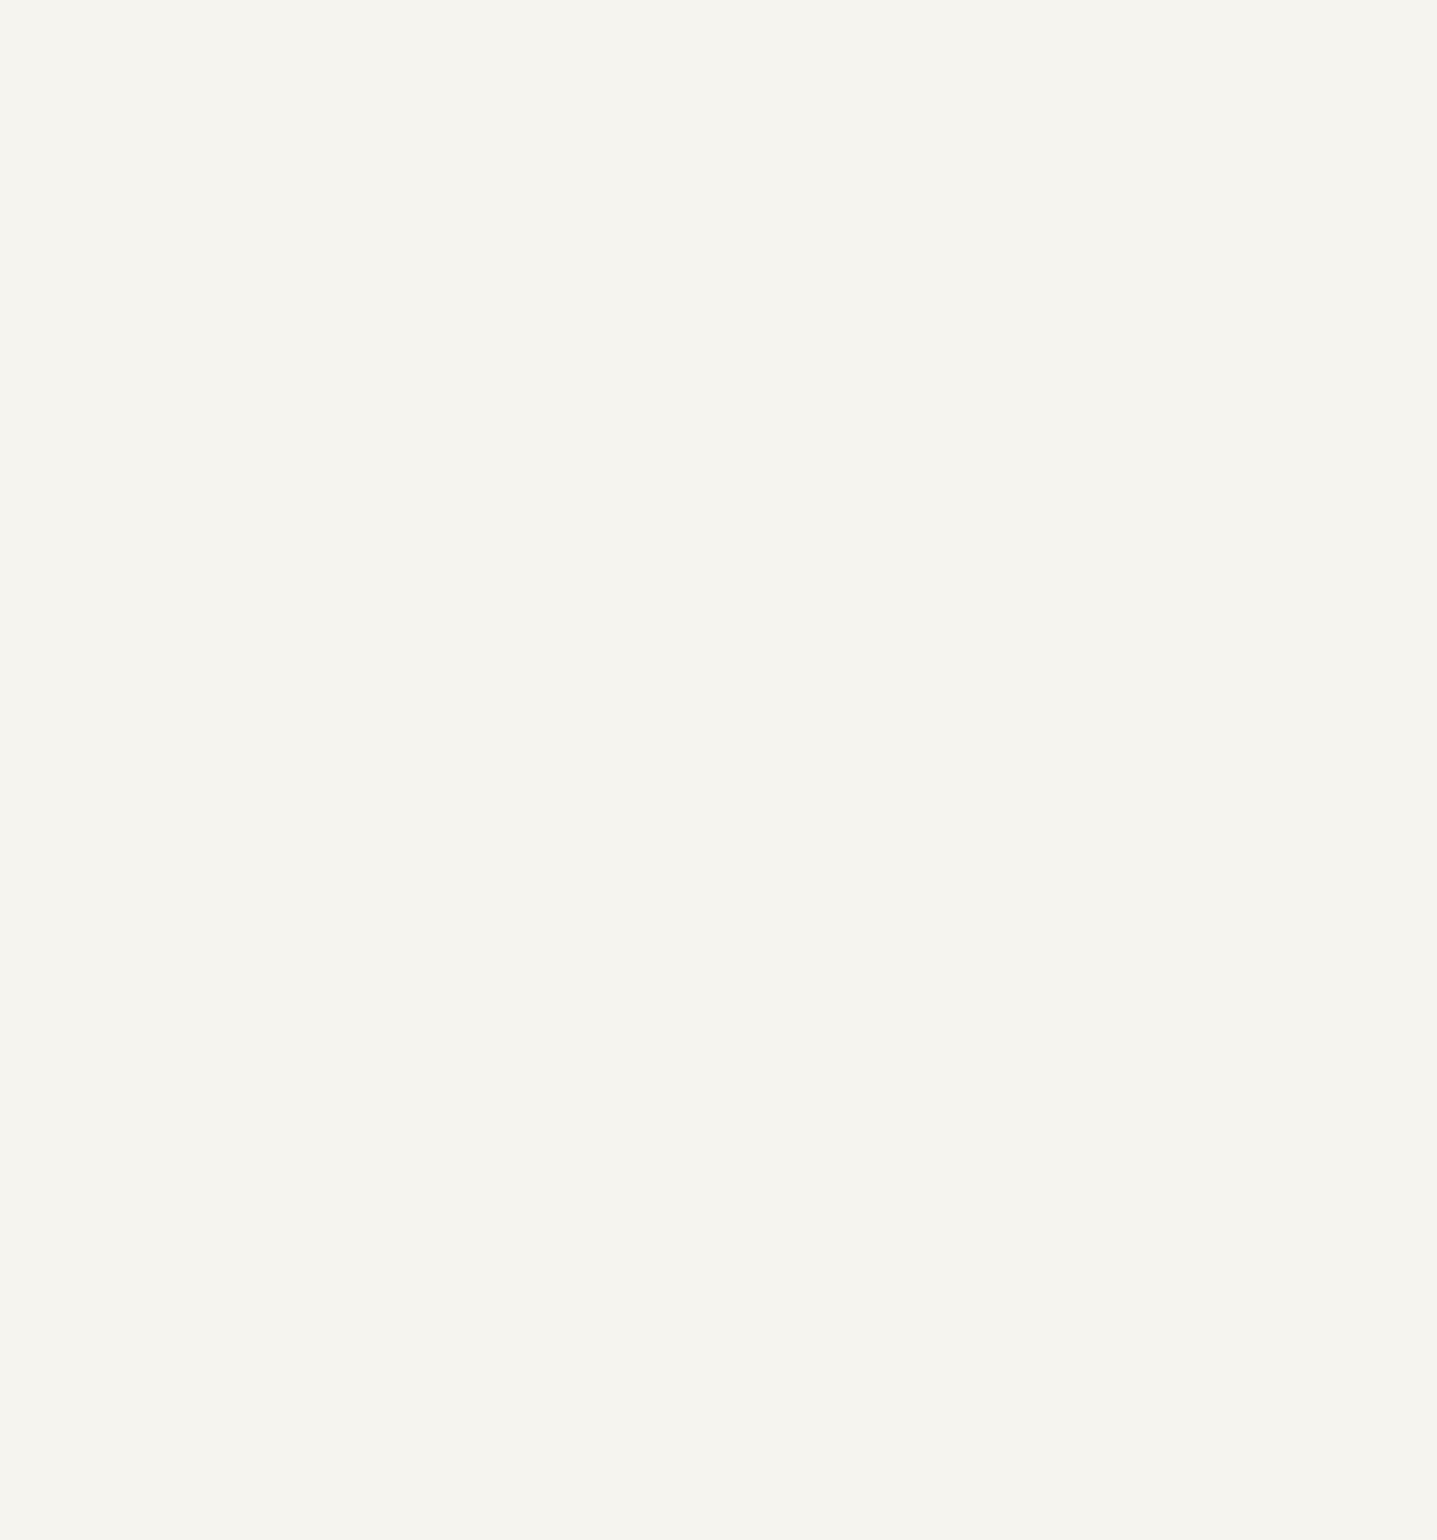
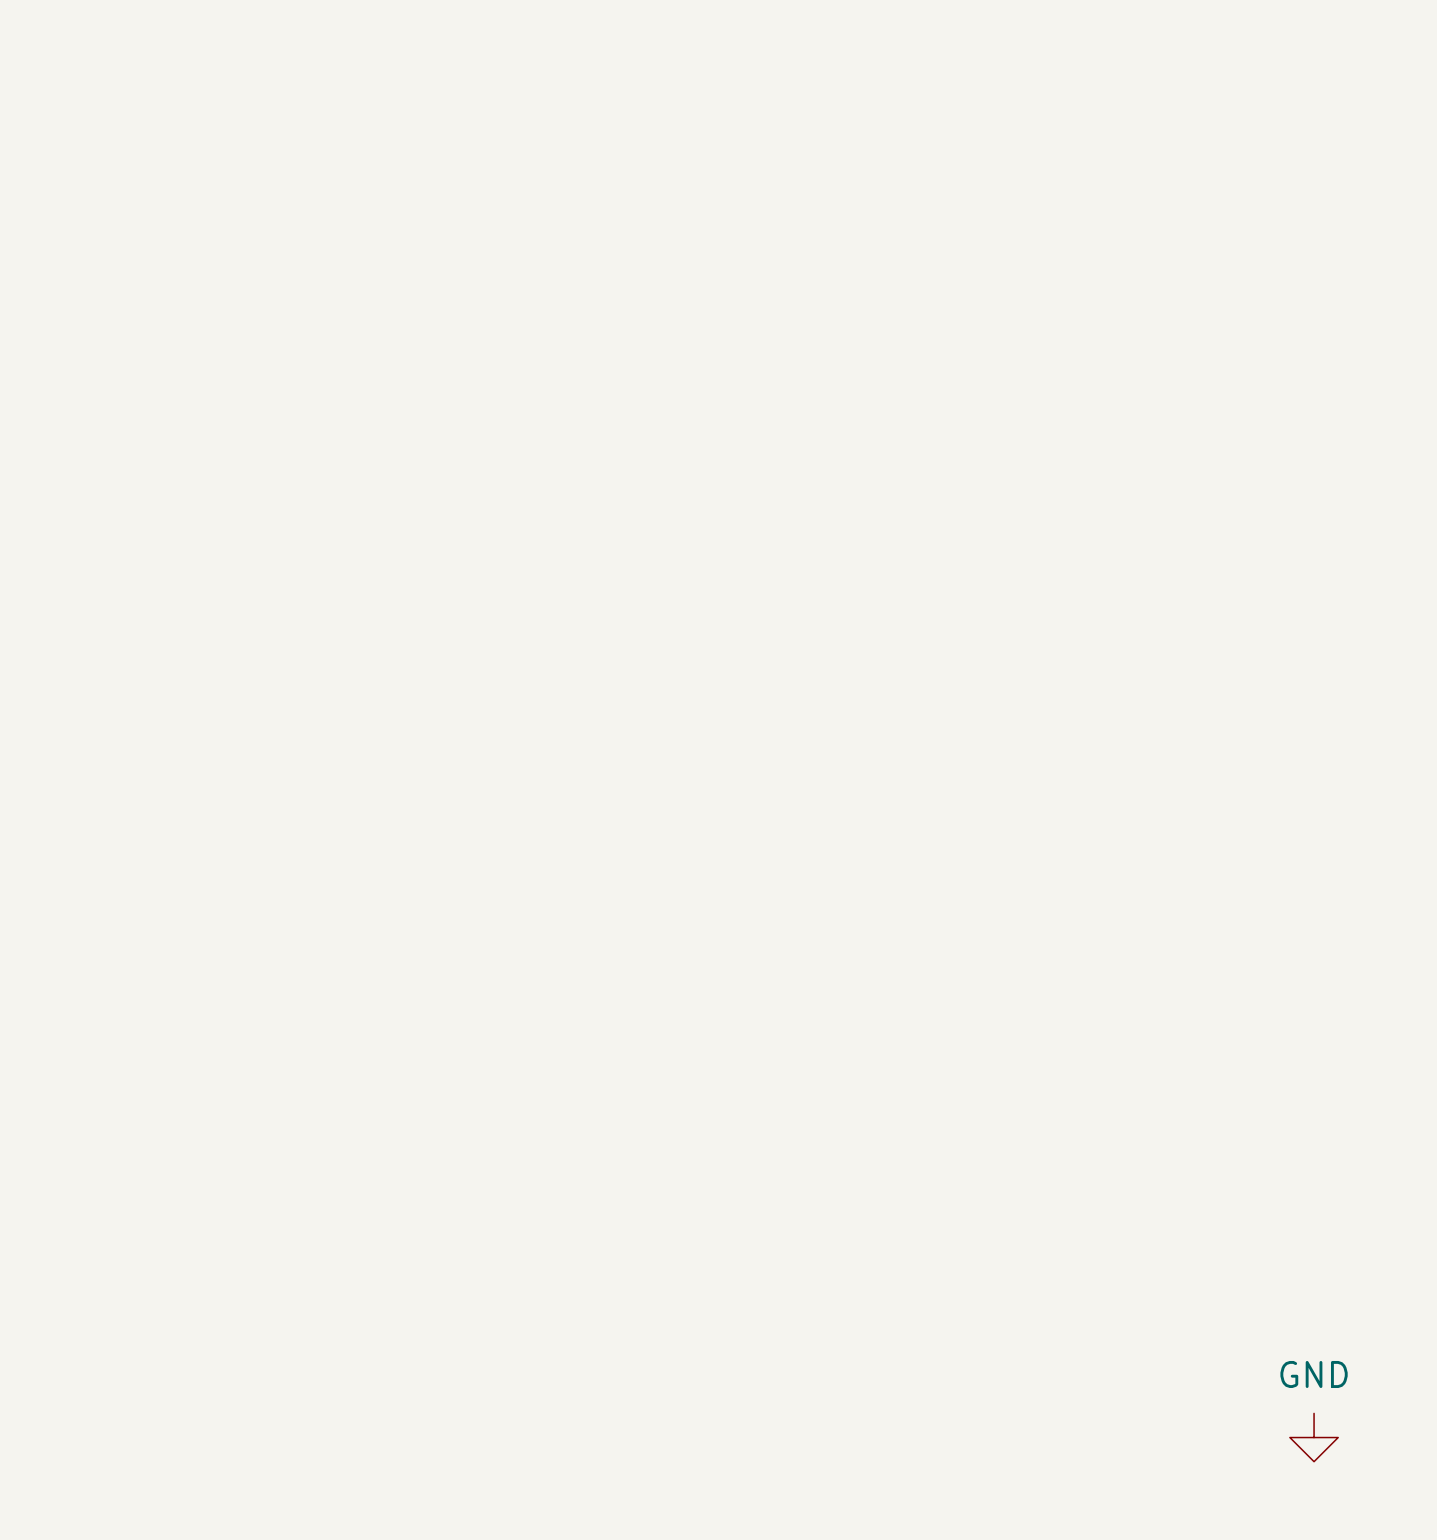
power symbol: none -> GND (1314, 1437)

